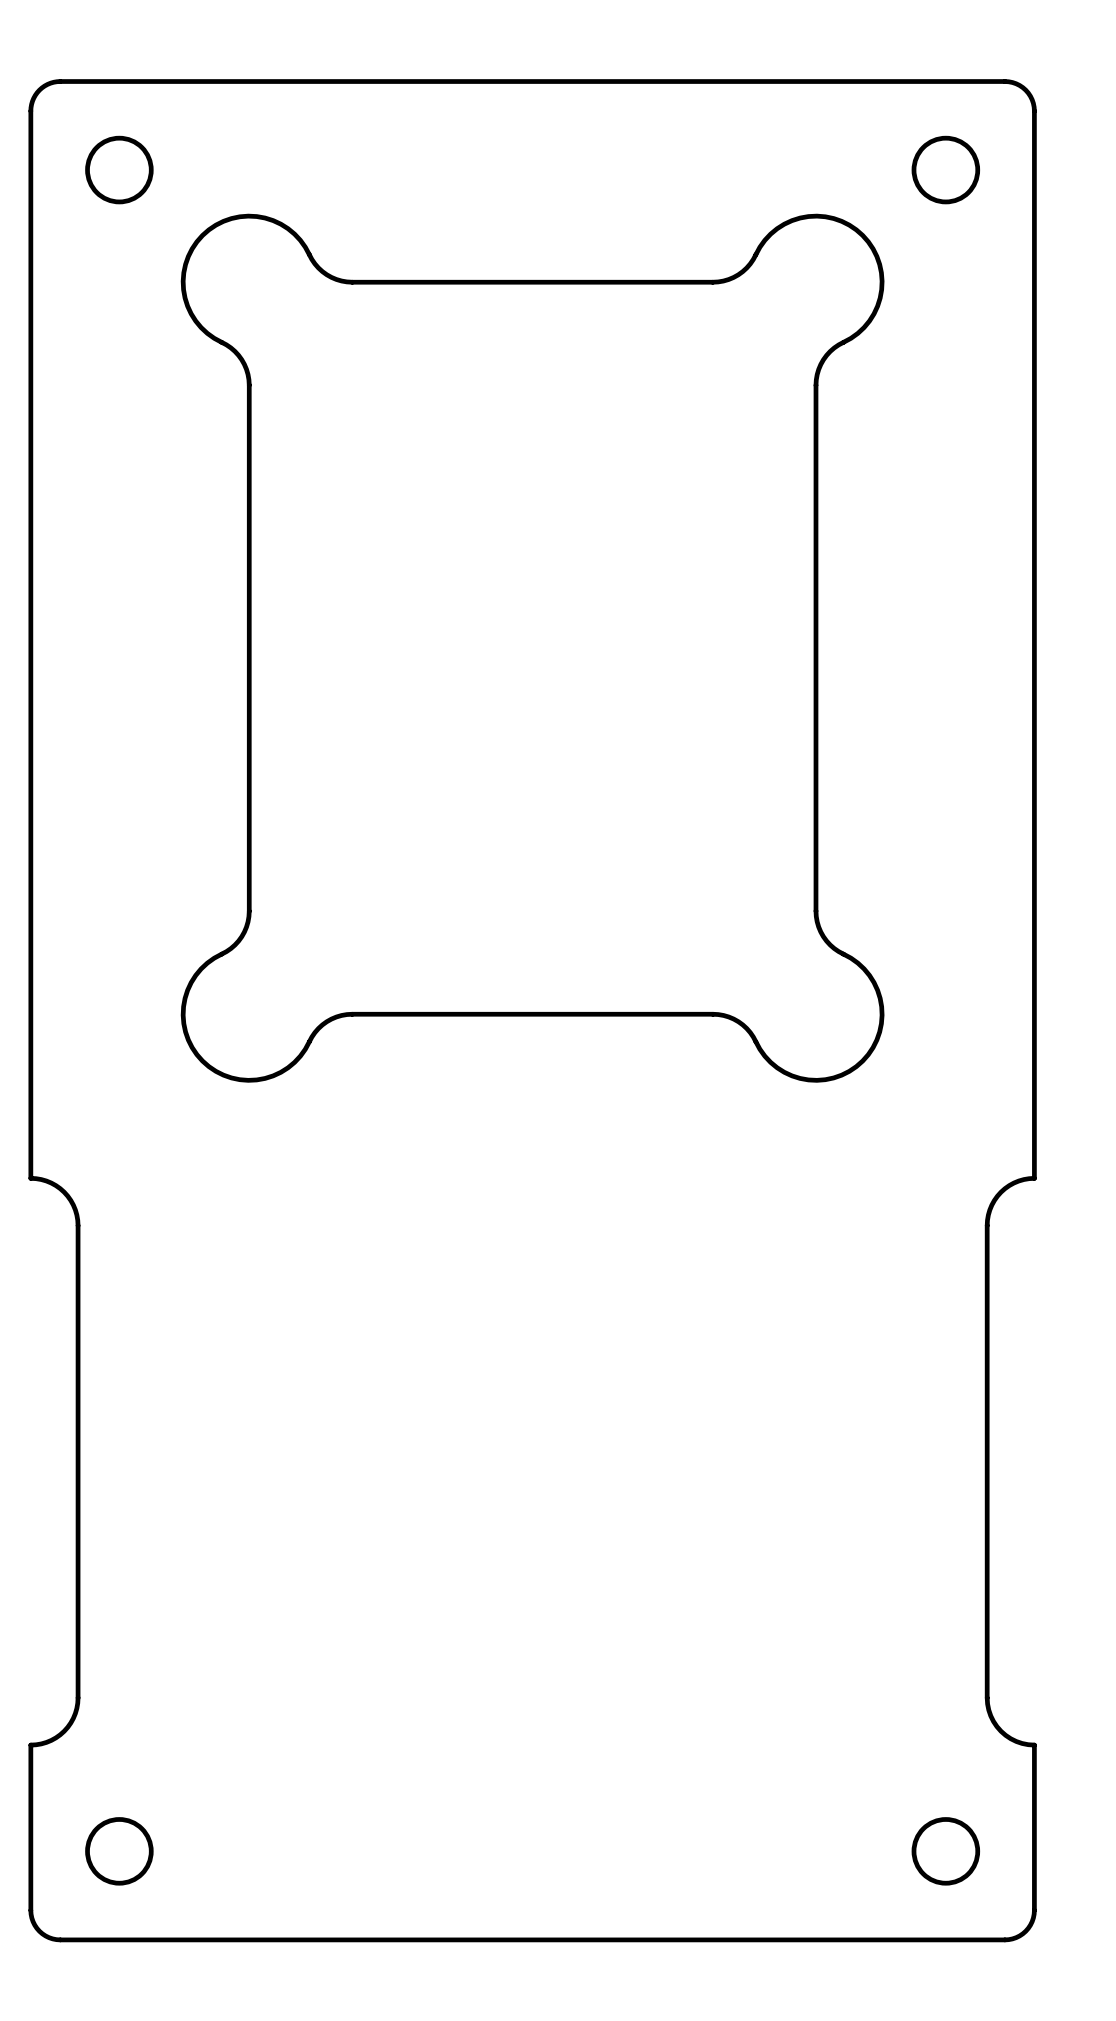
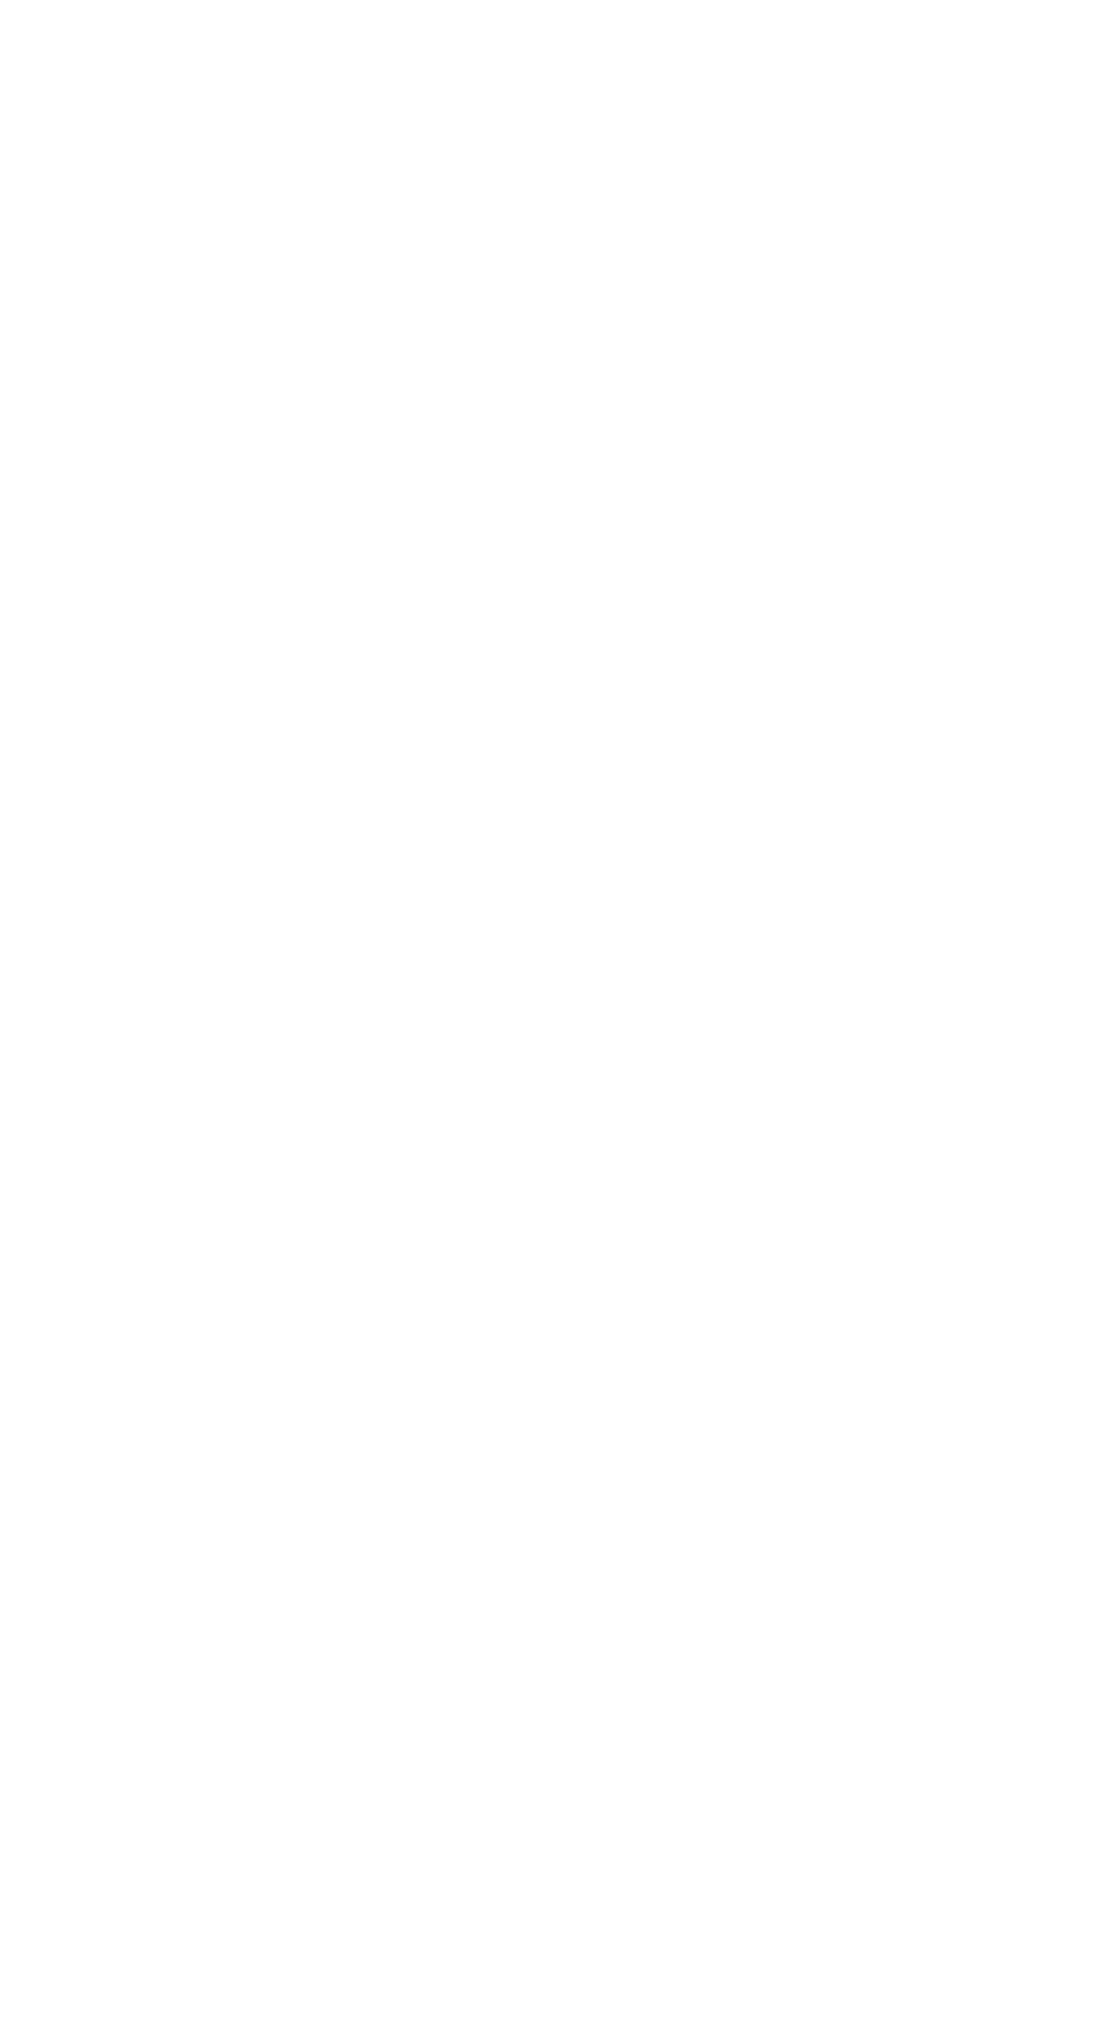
board edge: (60, 81) (1004, 81) (1019, 85) (1030, 96) (1034, 111) (1034, 1178) (1013, 1183) (1001, 1192) (991, 1205) (987, 1225) (987, 1704) (993, 1721) (1005, 1735) (1022, 1743) (1034, 1745) (1034, 1914) (1030, 1925) (1019, 1935) (1004, 1939) (60, 1939) (45, 1935) (34, 1925) (30, 1910) (30, 1745) (51, 1740) (64, 1731) (75, 1713) (78, 1697) (77, 1220) (70, 1200) (60, 1188) (46, 1181) (30, 1178) (30, 111) (33, 98) (39, 90) (50, 83) (60, 81) -> none
round board edge: [85, 135, 154, 205] -> none
round board edge: [911, 135, 981, 205] -> none
board edge: (309, 254) (318, 267) (326, 274) (346, 281) (718, 281) (733, 277) (742, 271) (750, 263) (764, 240) (777, 228) (792, 220) (816, 216) (833, 218) (849, 225) (862, 235) (873, 248) (881, 272) (881, 289) (877, 306) (864, 327) (826, 355) (818, 369) (815, 385) (816, 916) (818, 926) (826, 941) (834, 948) (857, 963) (869, 975) (880, 998) (882, 1015) (879, 1031) (873, 1047) (862, 1061) (849, 1071) (833, 1077) (816, 1080) (792, 1075) (770, 1062) (742, 1024) (728, 1016) (712, 1014) (346, 1014) (331, 1019) (322, 1024) (314, 1032) (300, 1056) (288, 1067) (273, 1075) (256, 1079) (239, 1079) (215, 1071) (202, 1061) (192, 1047) (185, 1031) (183, 1015) (187, 990) (201, 968) (238, 941) (244, 932) (248, 916) (249, 385) (246, 369) (238, 355) (230, 347) (207, 333) (191, 313) (183, 289) (183, 272) (188, 256) (202, 235) (215, 225) (239, 216) (265, 218) (280, 224) (300, 240) (309, 254) -> none
round board edge: [85, 1817, 154, 1886] -> none
round board edge: [911, 1817, 981, 1886] -> none

